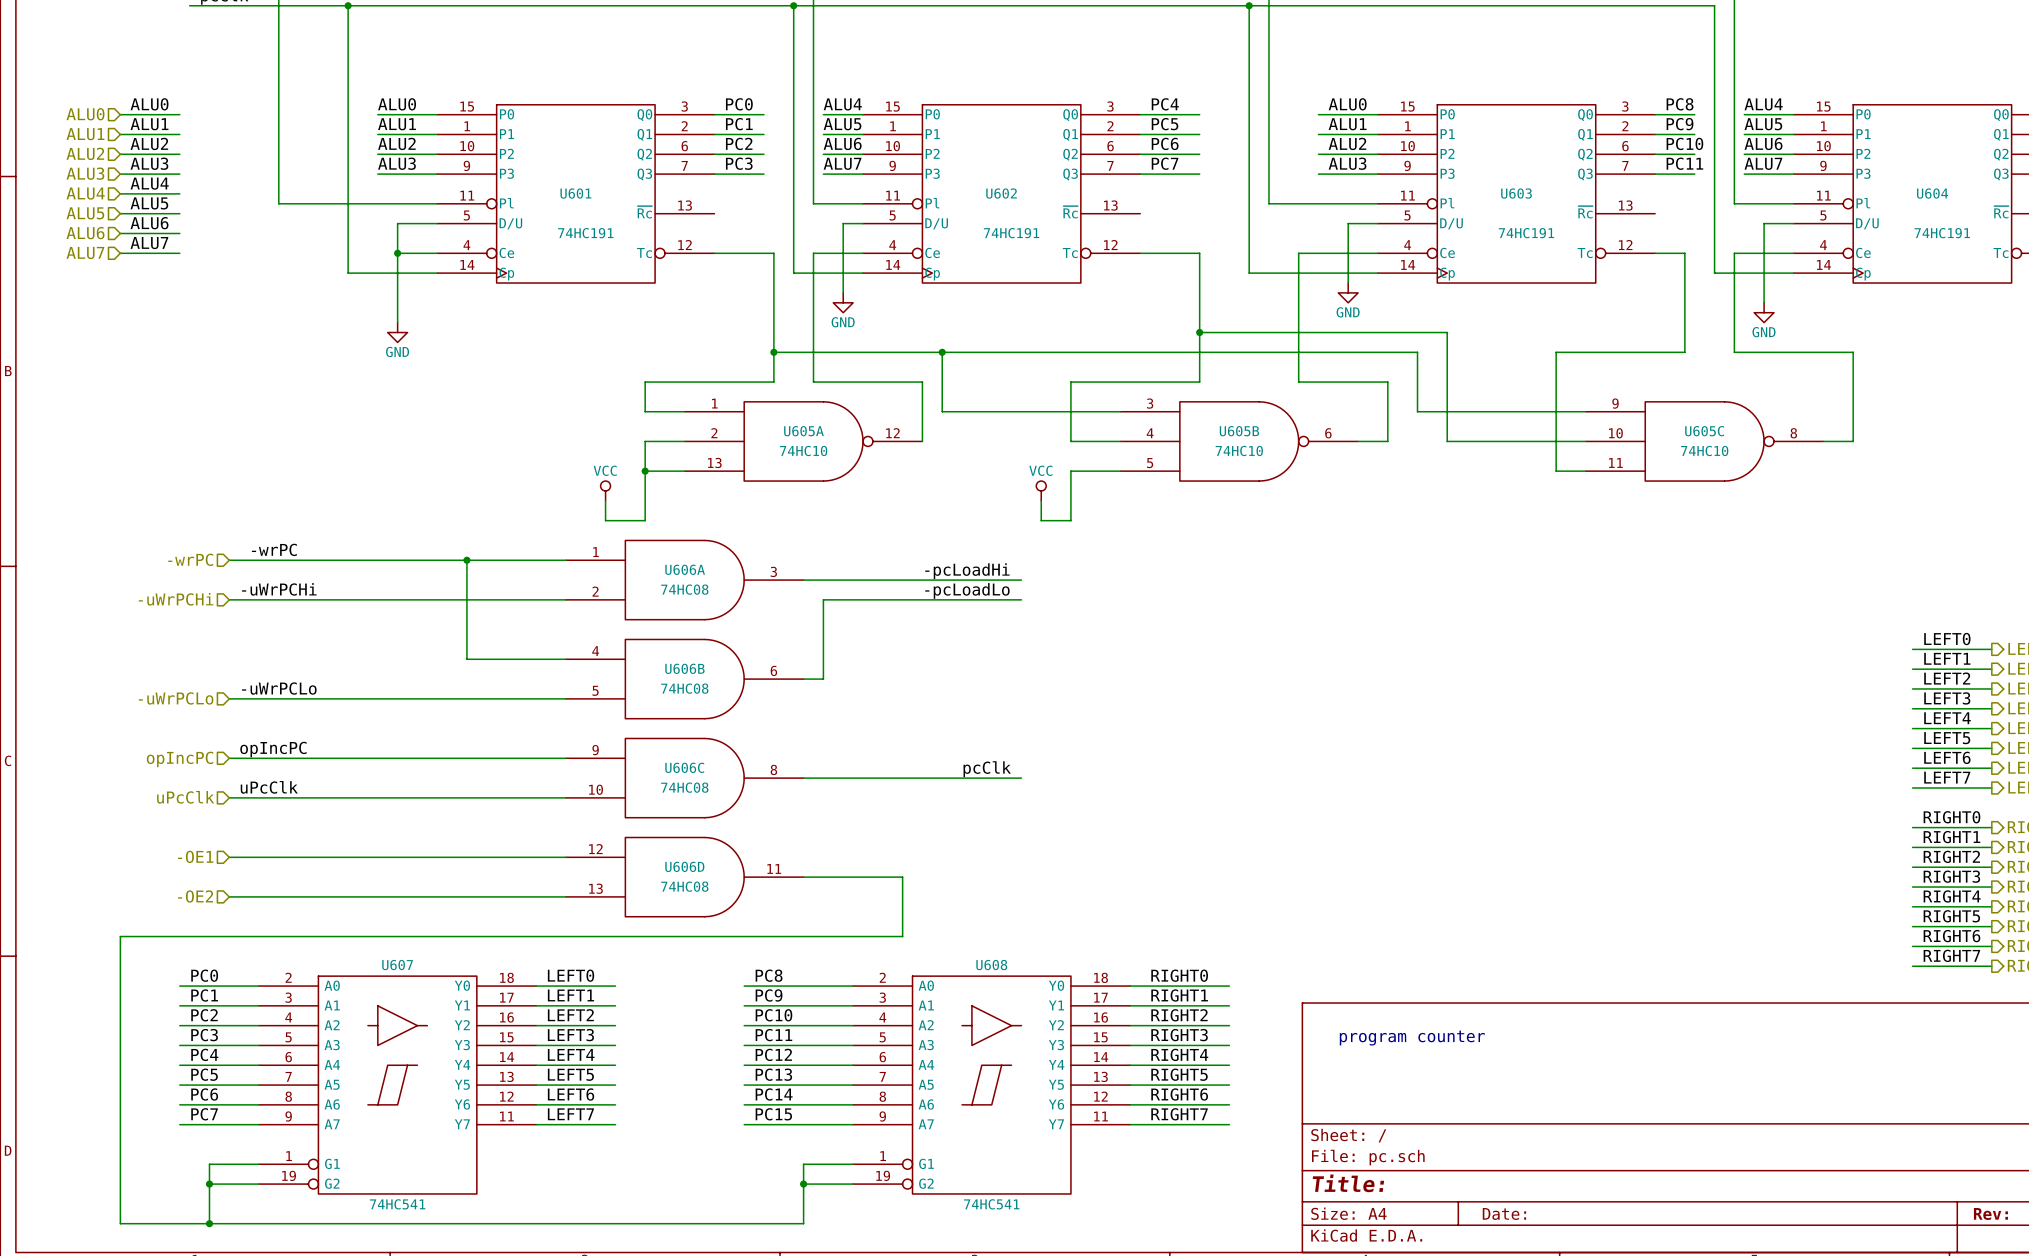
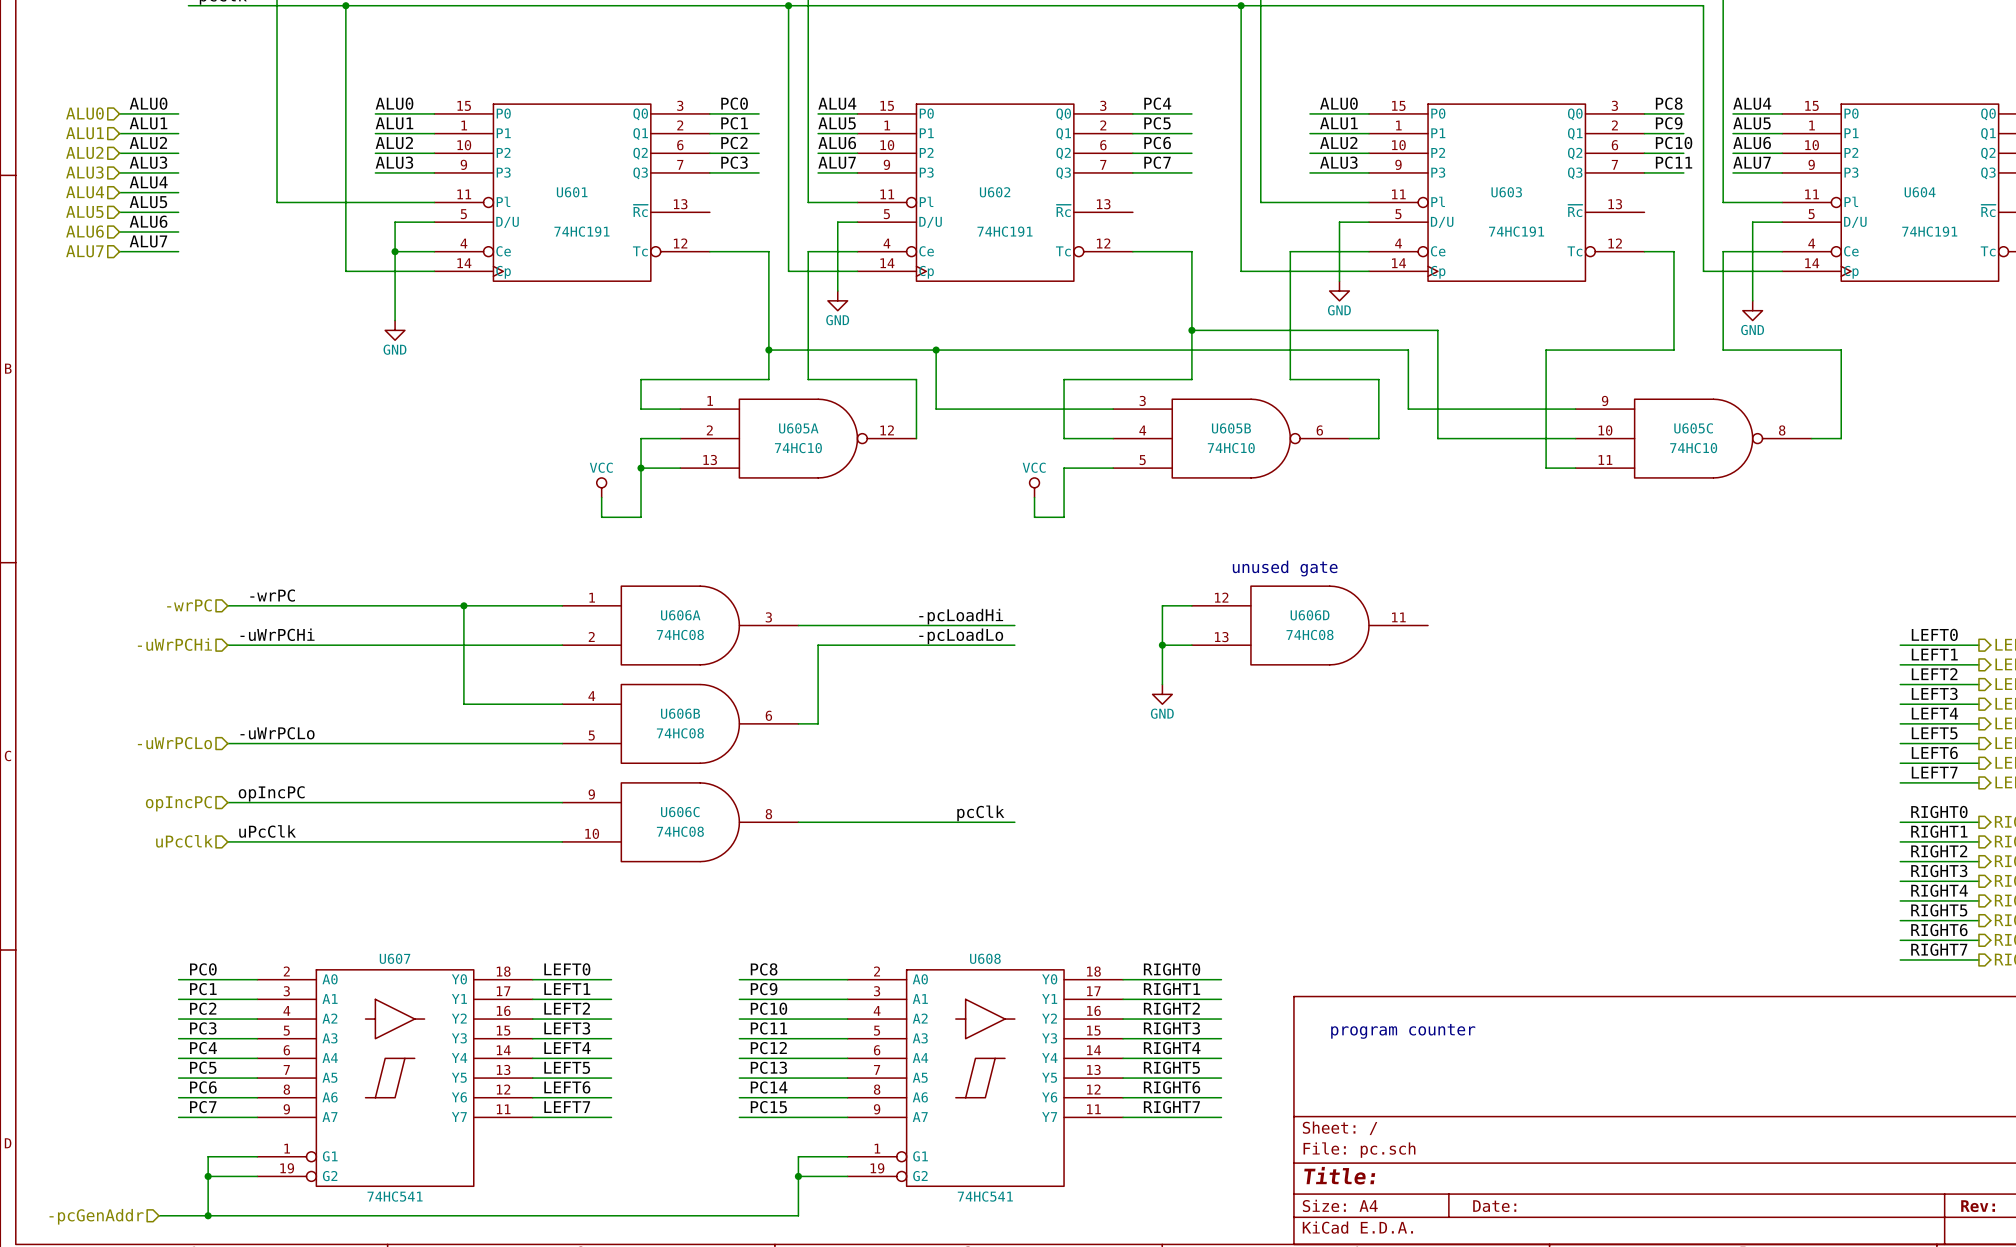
label position: -wrPC (274, 549) -> -wrPC (272, 595)
hierarchical label position: -wrPC (190, 559) -> -wrPC (189, 605)
wire: (229, 560) (565, 560) -> (227, 605) (562, 605)
wire: (466, 560) (466, 609) -> none
junction: (466, 560) -> none
label position: -pcLoadHi (967, 571) -> -pcLoadHi (961, 616)
text: none -> unused gate (1285, 568)
U606A position: (684, 580) -> (680, 625)
wire: (803, 580) (1021, 580) -> (798, 625) (1014, 625)
label position: -uWrPCHi (279, 589) -> -uWrPCHi (277, 634)
label position: -pcLoadLo (967, 590) -> -pcLoadLo (961, 636)
hierarchical label position: -uWrPCHi (176, 599) -> -uWrPCHi (174, 644)
wire: (229, 599) (565, 599) -> (227, 645) (562, 645)
wire: (1021, 599) (823, 599) (823, 649) -> (1014, 645) (818, 645)
junction: none -> (463, 605)
wire: none -> (1191, 605) (1162, 605) (1162, 684)
wire: none -> (1162, 645) (1191, 645)
junction: none -> (1162, 645)
wire: (466, 659) (565, 659) -> (463, 655) (463, 704) (562, 704)
U606B position: (684, 679) -> (680, 723)
wire: (803, 679) (823, 679) -> (798, 723) (818, 723) (818, 674)
label position: -uWrPCLo (279, 688) -> -uWrPCLo (277, 733)
hierarchical label position: -uWrPCLo (176, 698) -> -uWrPCLo (174, 743)
wire: (229, 698) (565, 698) -> (227, 743) (562, 743)
power symbol: none -> GND (1162, 694)
label position: opIncPC (273, 749) -> opIncPC (271, 793)
wire: (229, 758) (565, 758) -> (227, 802) (562, 802)
hierarchical label position: opIncPC (180, 759) -> opIncPC (178, 803)
label position: pcClk (987, 769) -> pcClk (980, 813)
U606C position: (684, 778) -> (680, 822)
wire: (803, 778) (1021, 778) -> (798, 822) (1014, 822)
label position: uPcClk (269, 787) -> uPcClk (267, 831)
hierarchical label position: uPcClk (185, 797) -> uPcClk (184, 841)
wire: (229, 797) (565, 797) -> (227, 841) (562, 841)
hierarchical label: -OE1 (195, 856) -> none
wire: (229, 857) (565, 857) -> none
U606D position: (684, 877) -> (1309, 625)
wire: (803, 877) (902, 877) (902, 936) (120, 936) (120, 1223) (159, 1223) -> none
hierarchical label: -OE2 (195, 896) -> none
wire: (229, 896) (565, 896) -> none
hierarchical label: none -> -pcGenAddr (96, 1216)

